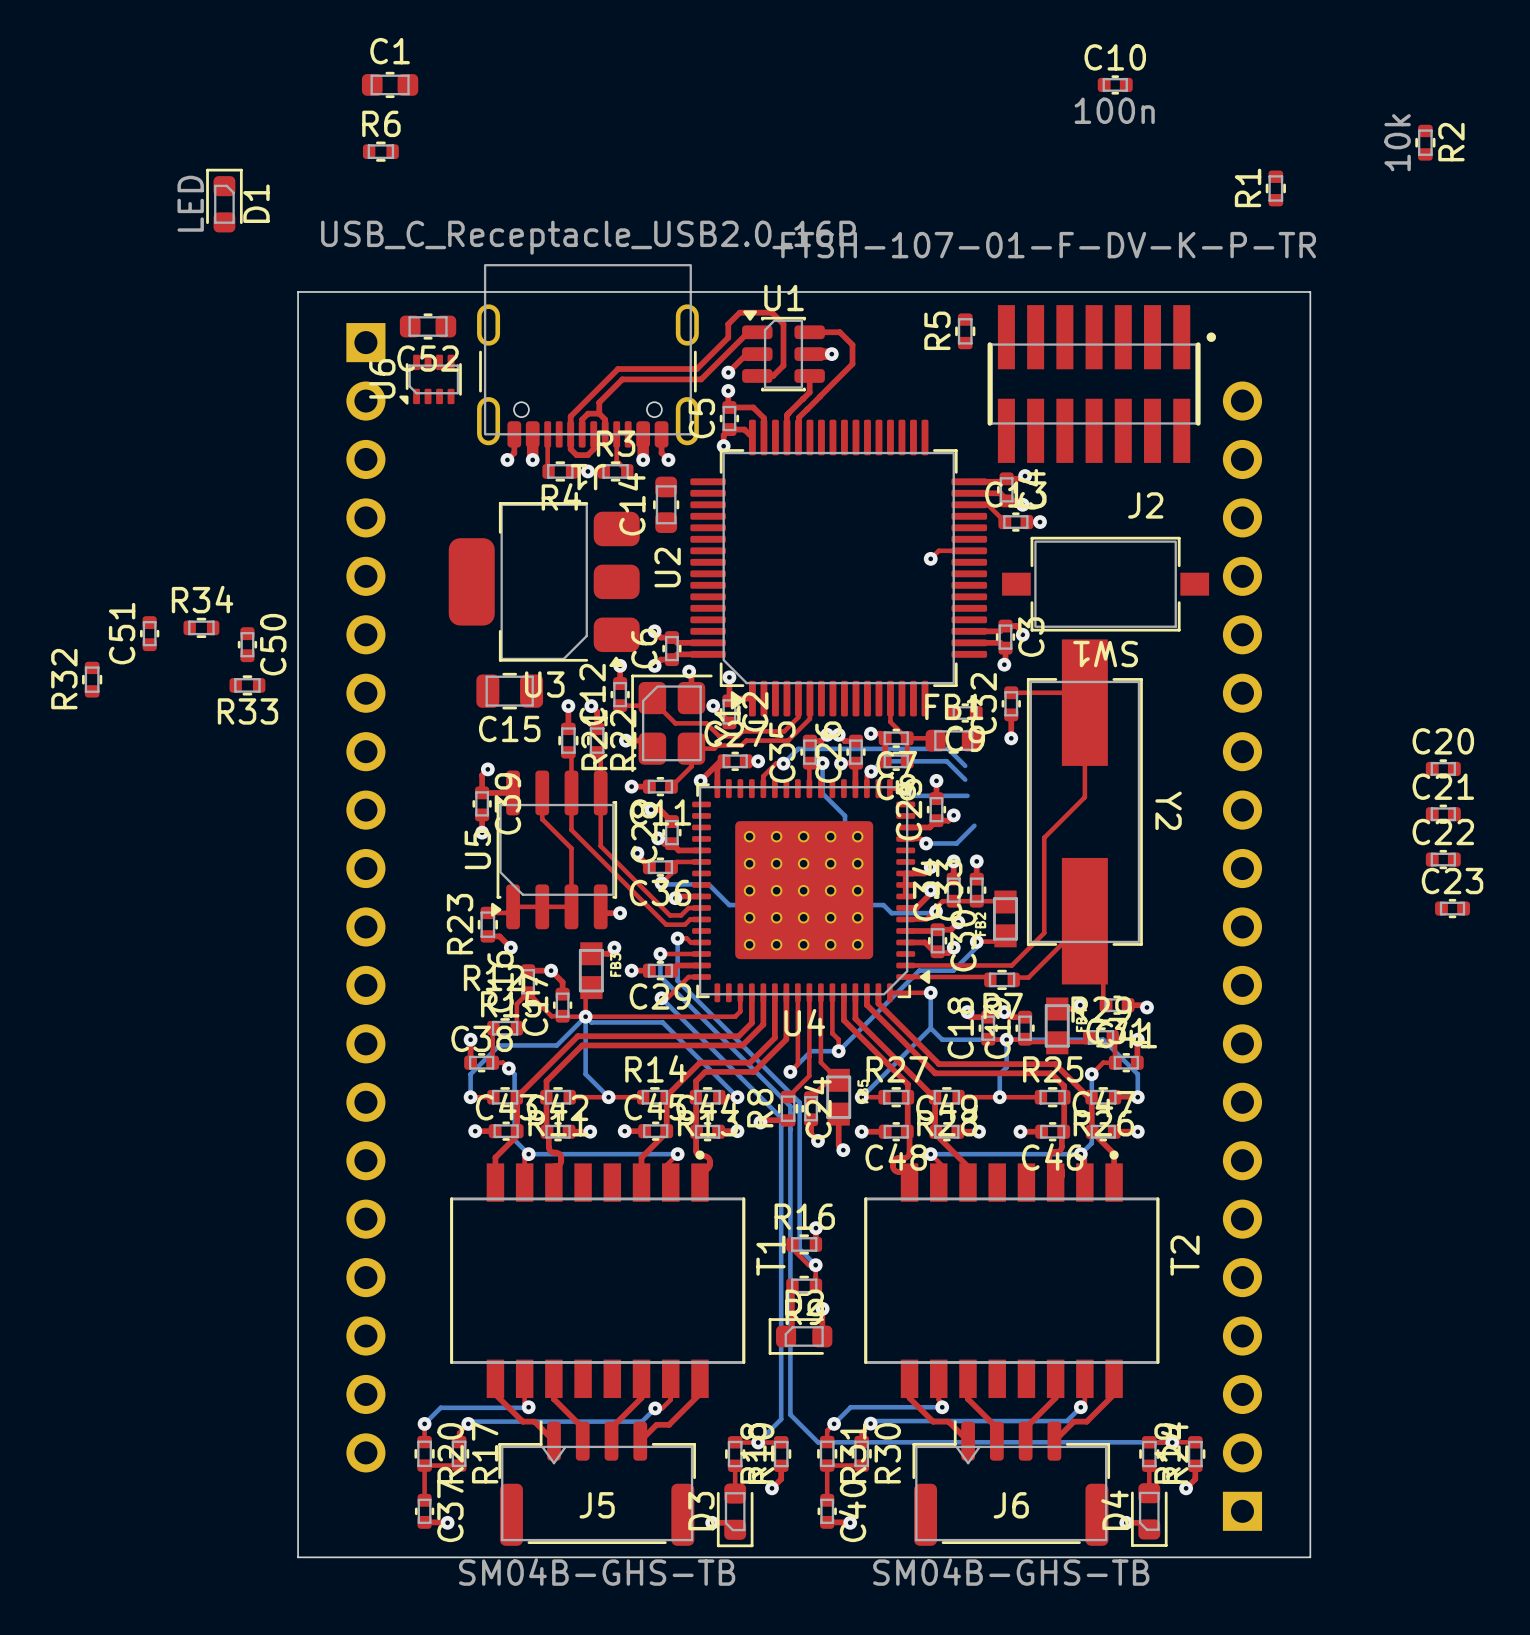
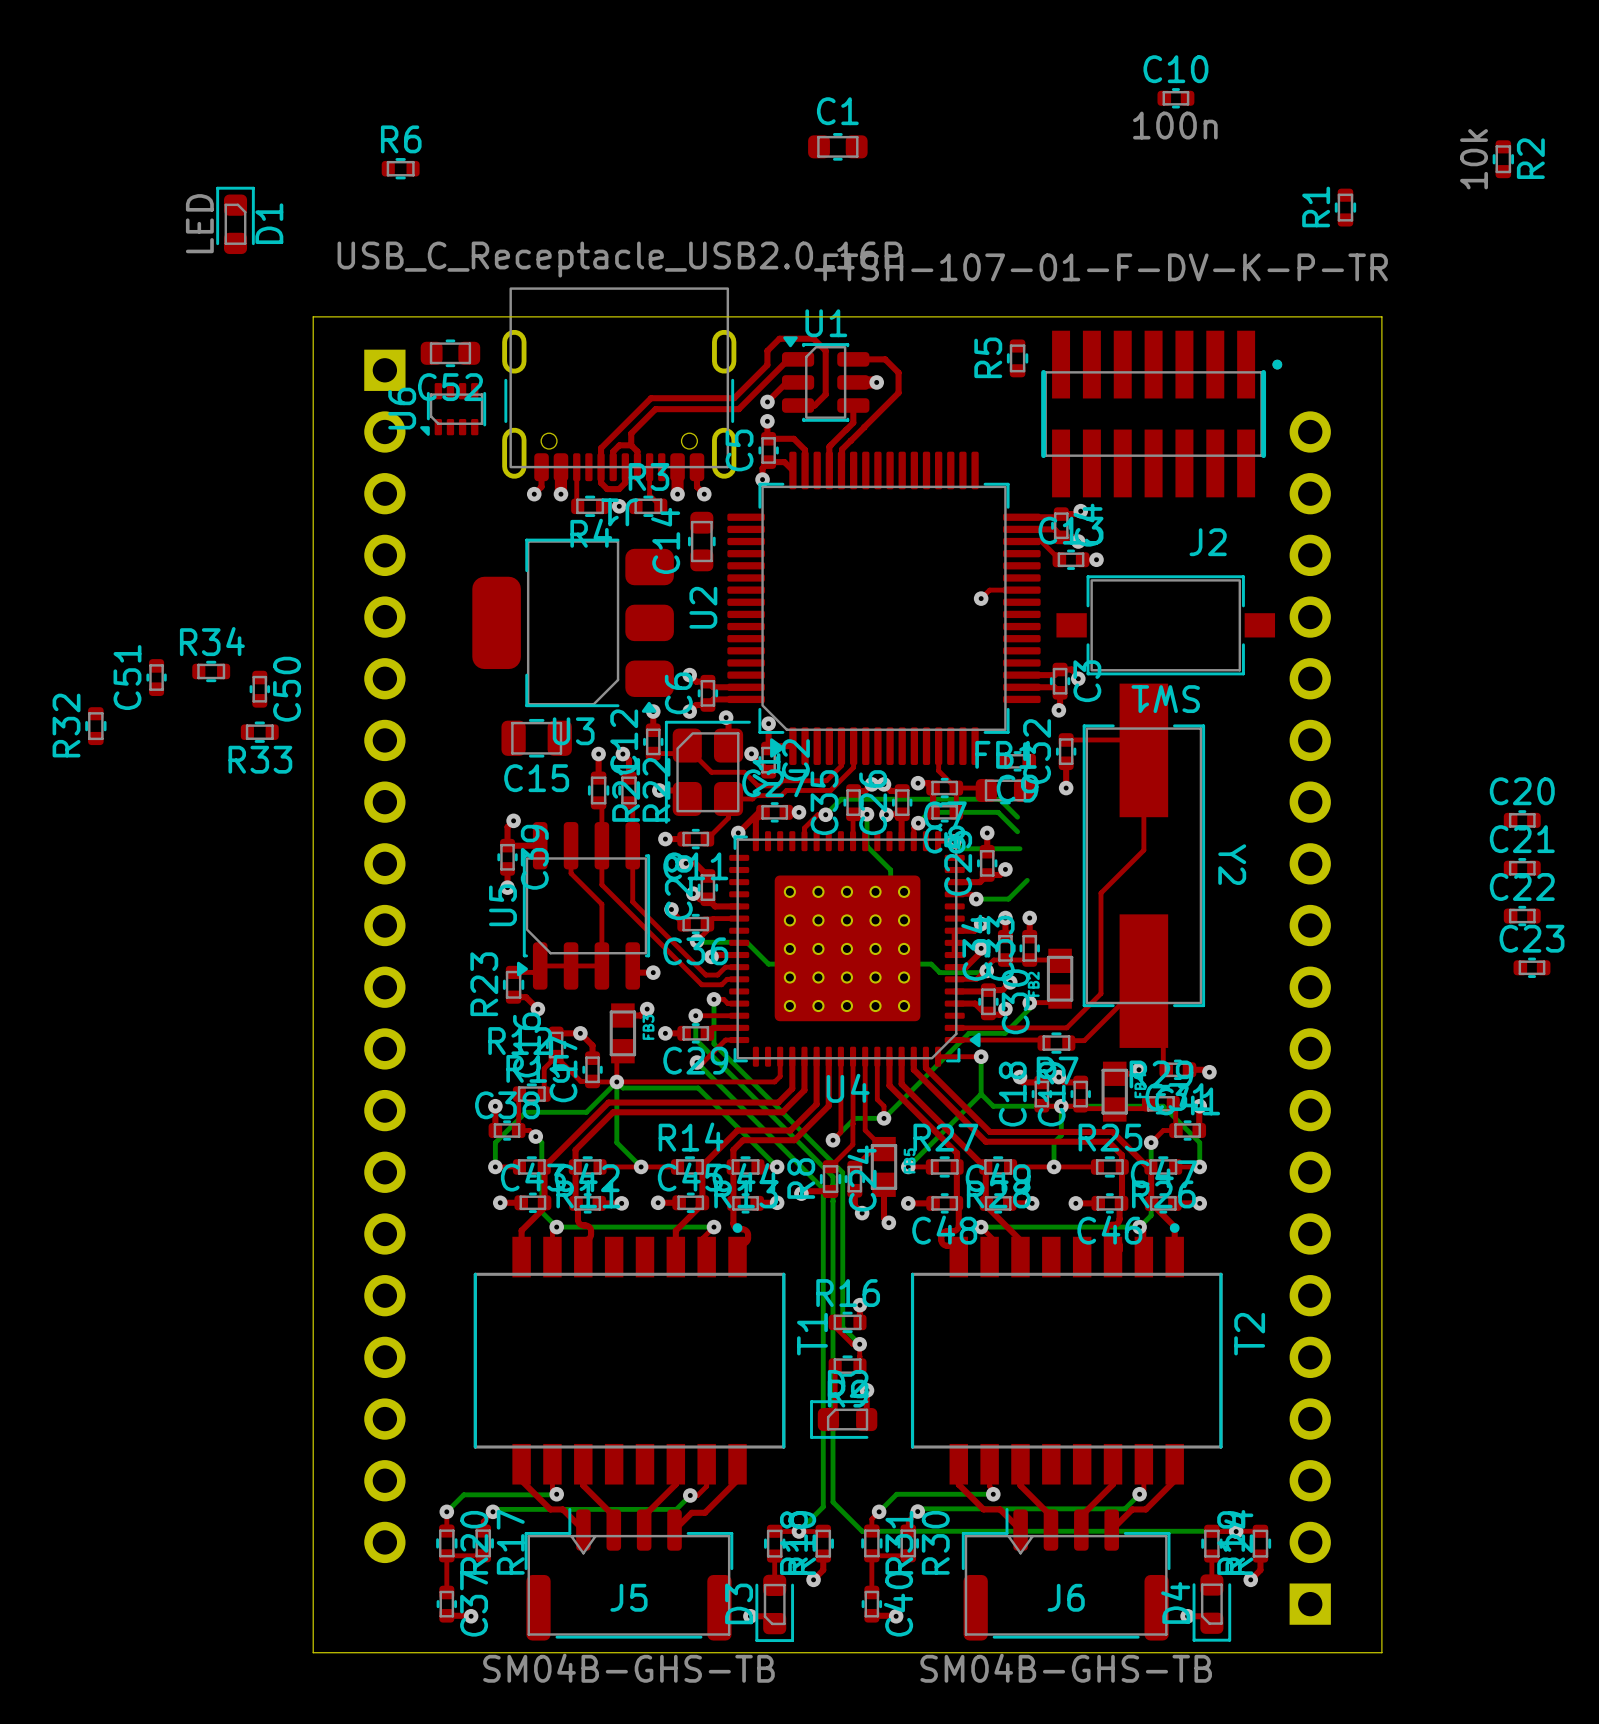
C1 position: (390, 84) -> (837, 146)

